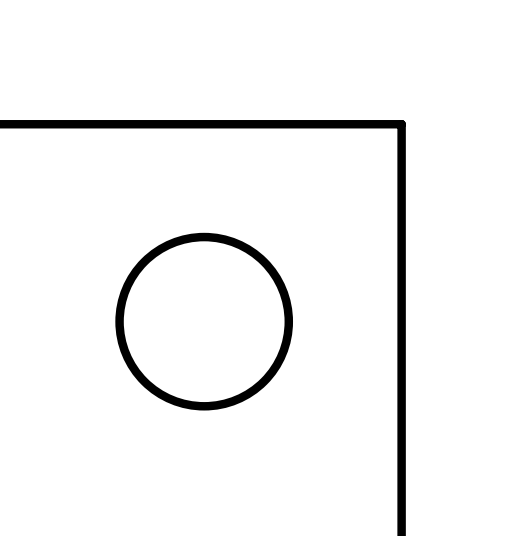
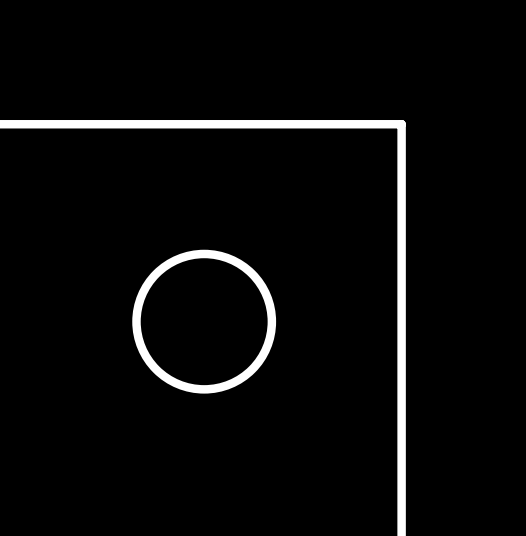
round board edge size: [115, 232, 294, 411] -> [132, 249, 277, 394]

